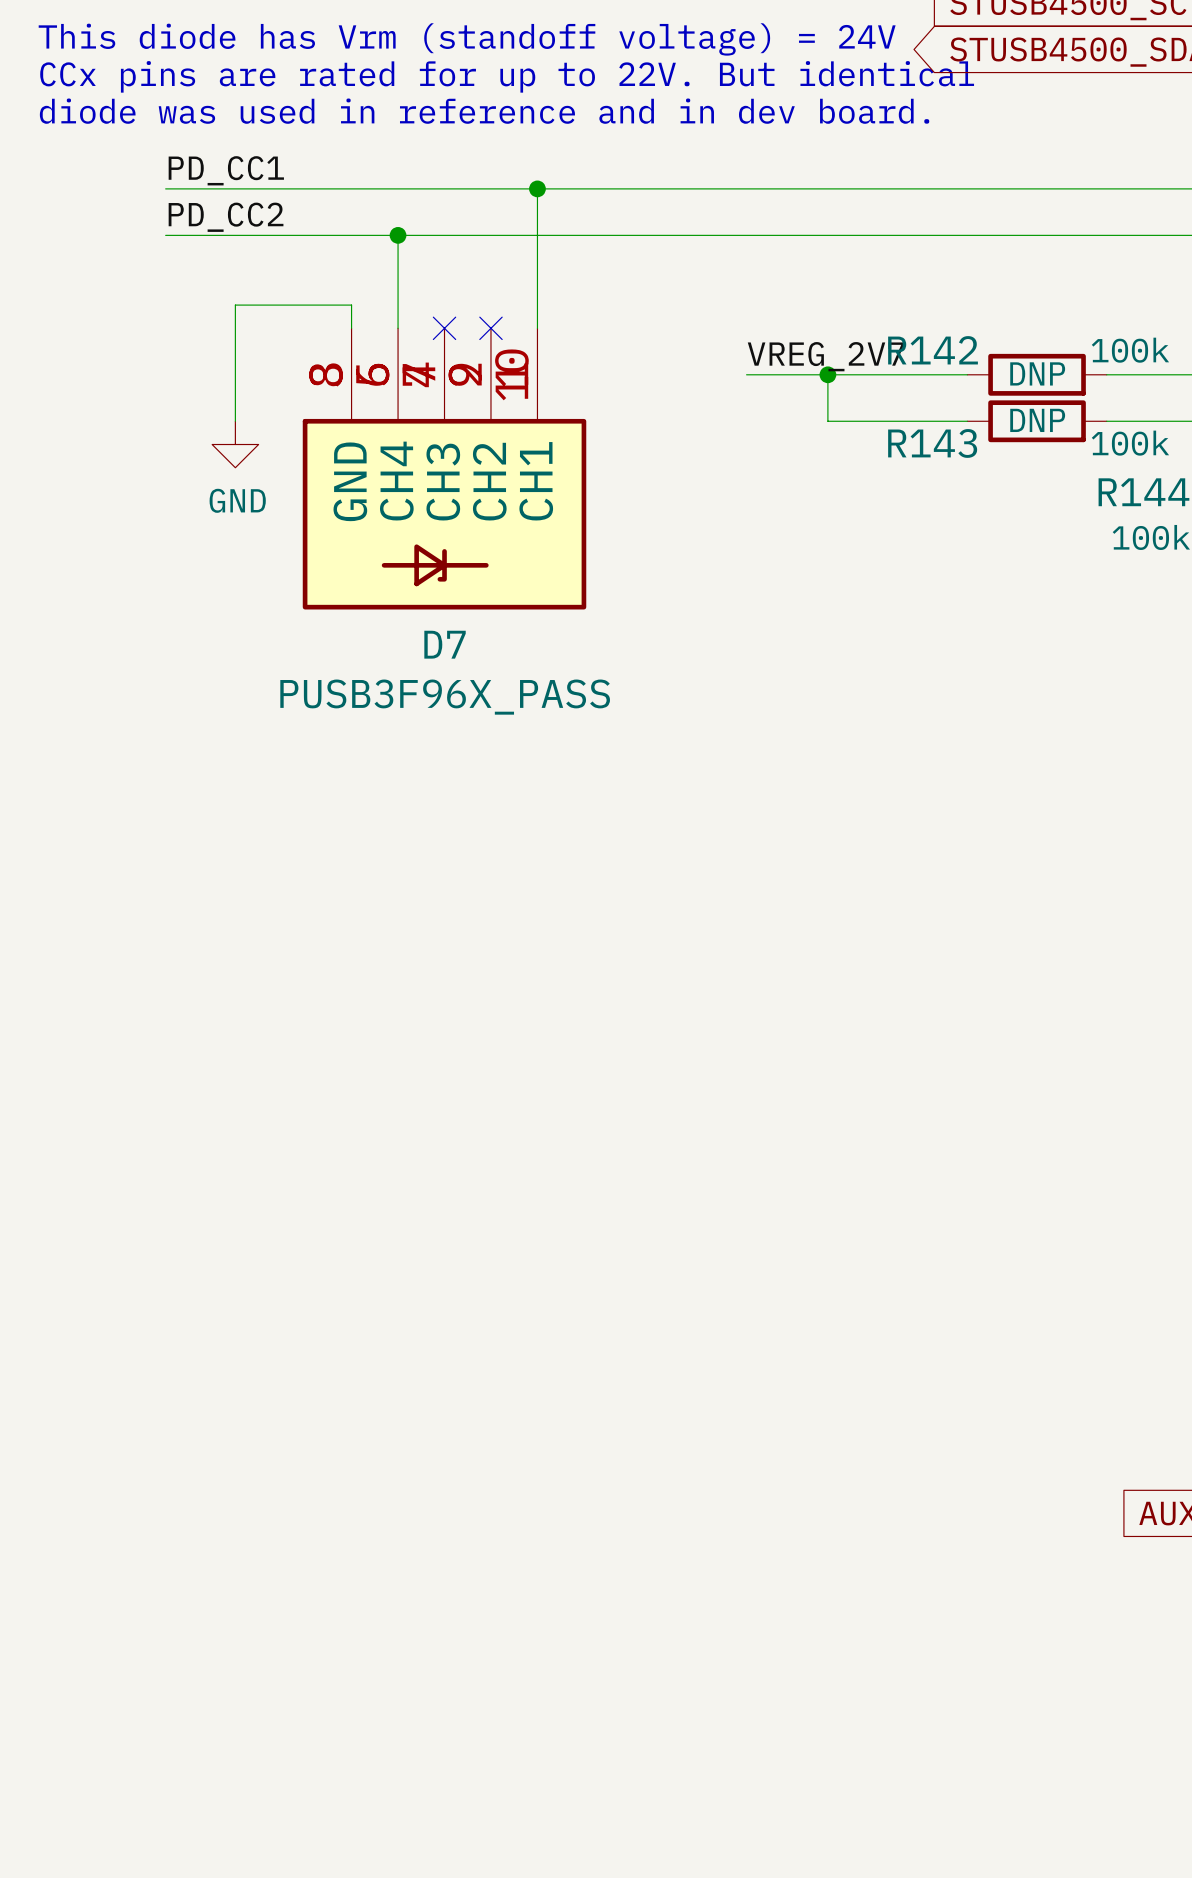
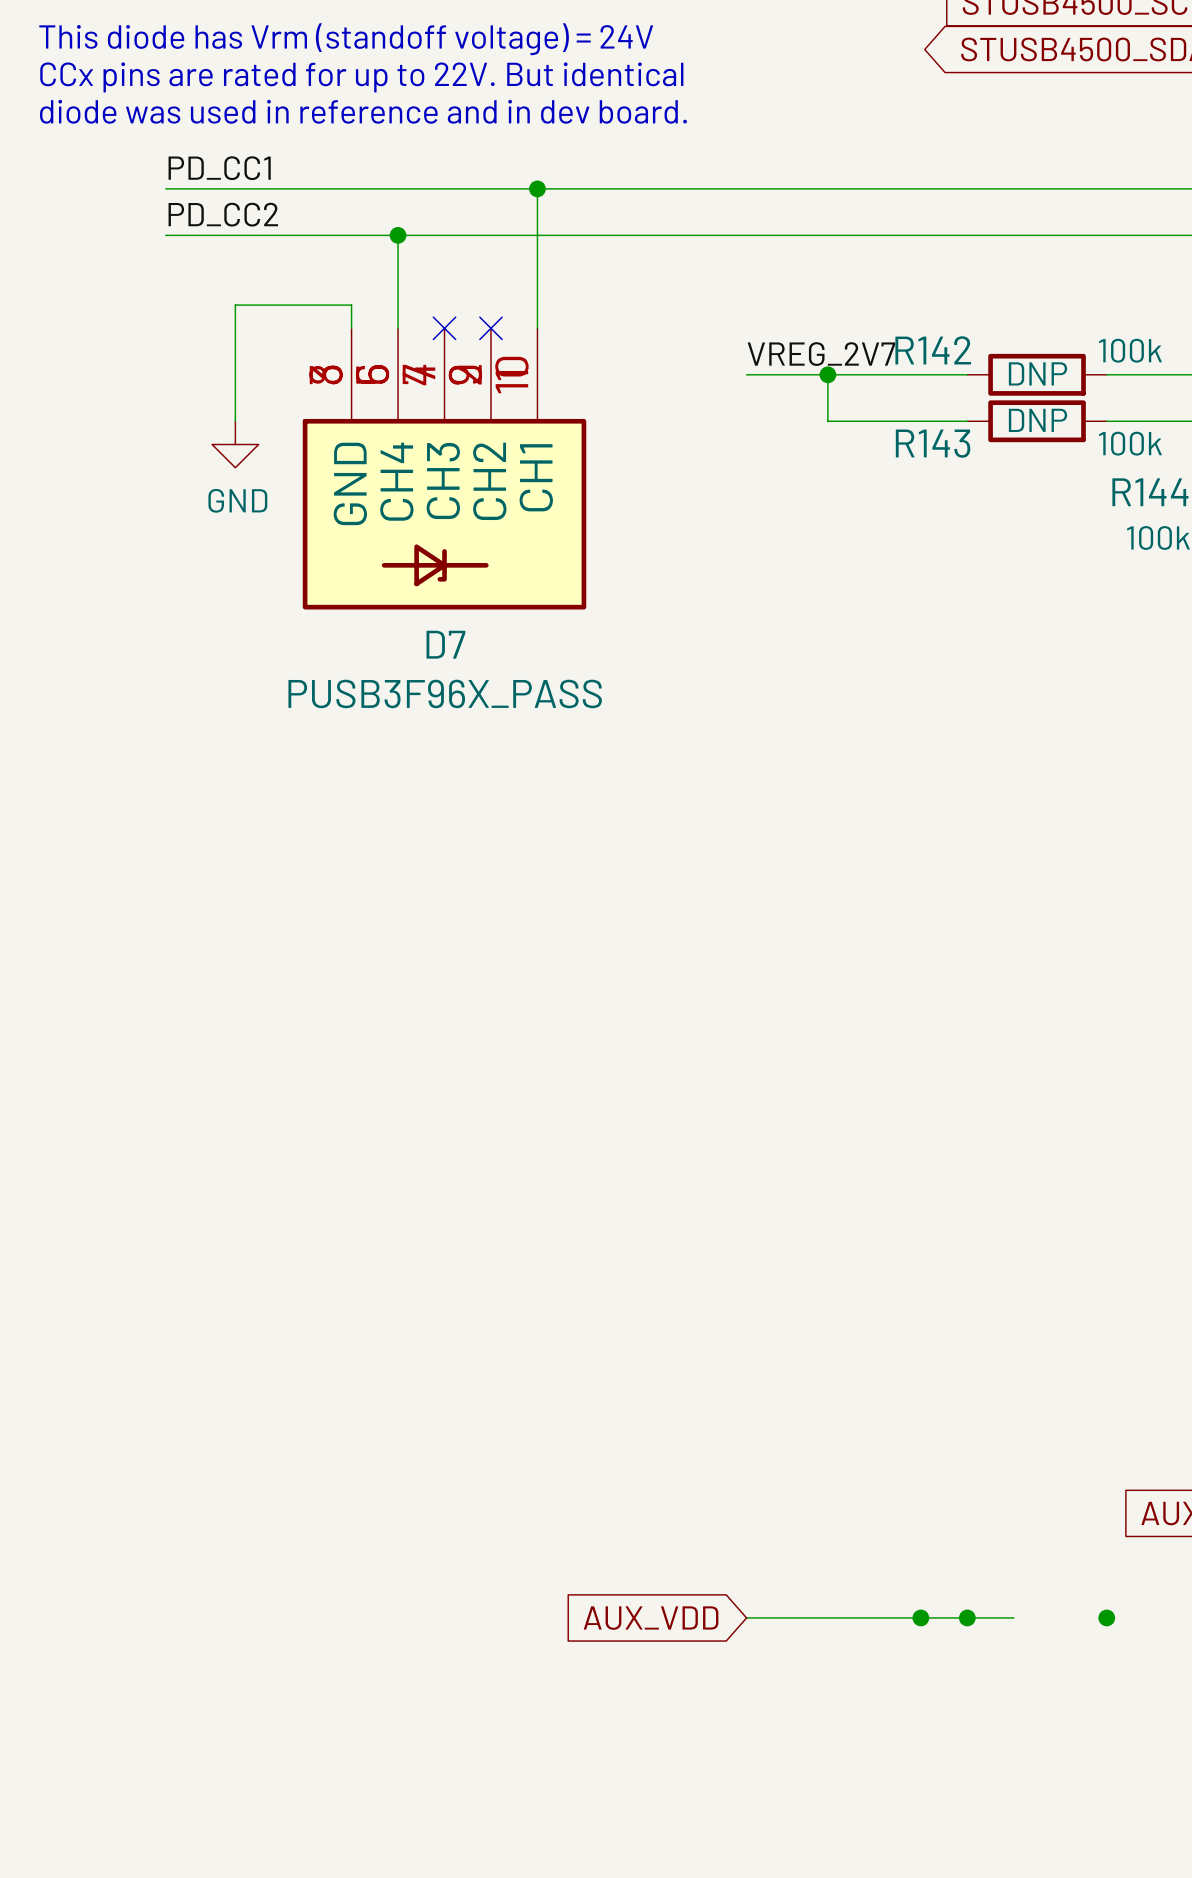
wire: none -> (746, 1617) (1013, 1617)
junction: none -> (920, 1617)
junction: none -> (967, 1617)
junction: none -> (1106, 1617)
global label: none -> AUX_VDD (651, 1618)

